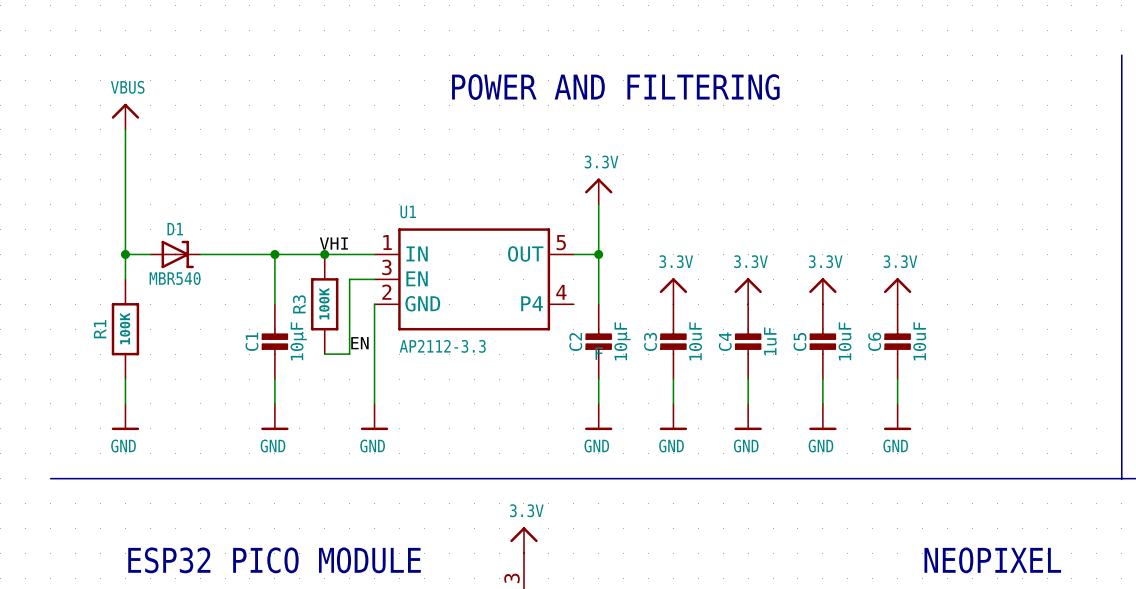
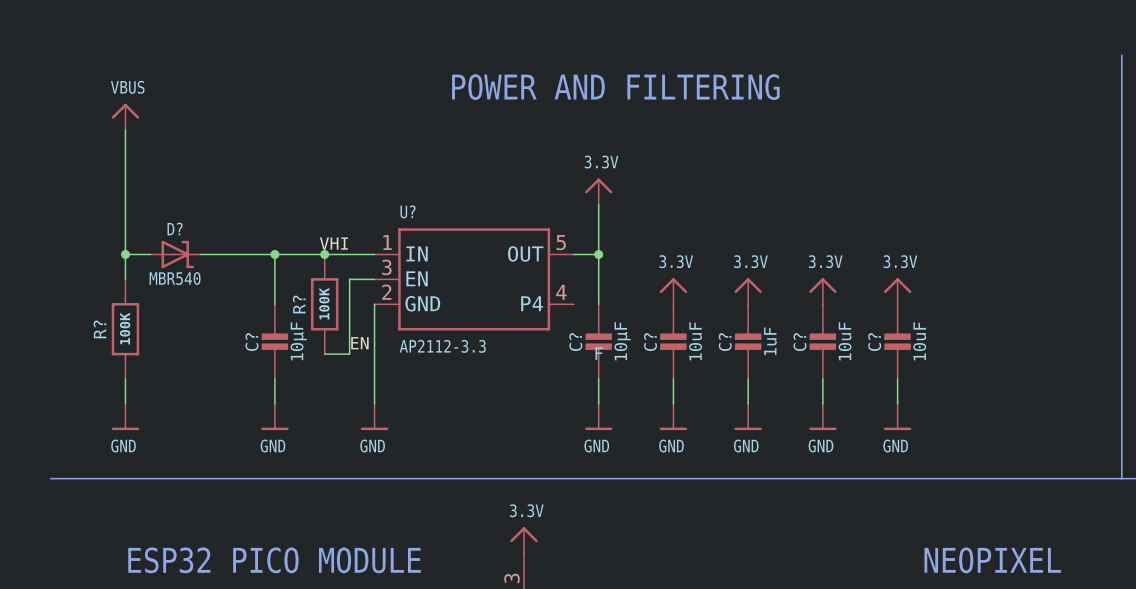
U1 name: U1 (408, 211) -> U? (408, 211)
D1 name: D1 (175, 229) -> D? (175, 228)
R3 name: R3 (299, 304) -> R? (299, 304)
R1 name: R1 (100, 329) -> R? (99, 329)
C1 name: C1 (251, 341) -> C? (251, 342)
C3 name: C3 (650, 341) -> C? (650, 342)
C4 name: C4 (725, 341) -> C? (725, 342)
C5 name: C5 (799, 341) -> C? (799, 342)
C6 name: C6 (874, 341) -> C? (874, 342)
C2 name: C2 (575, 342) -> C? (575, 342)

